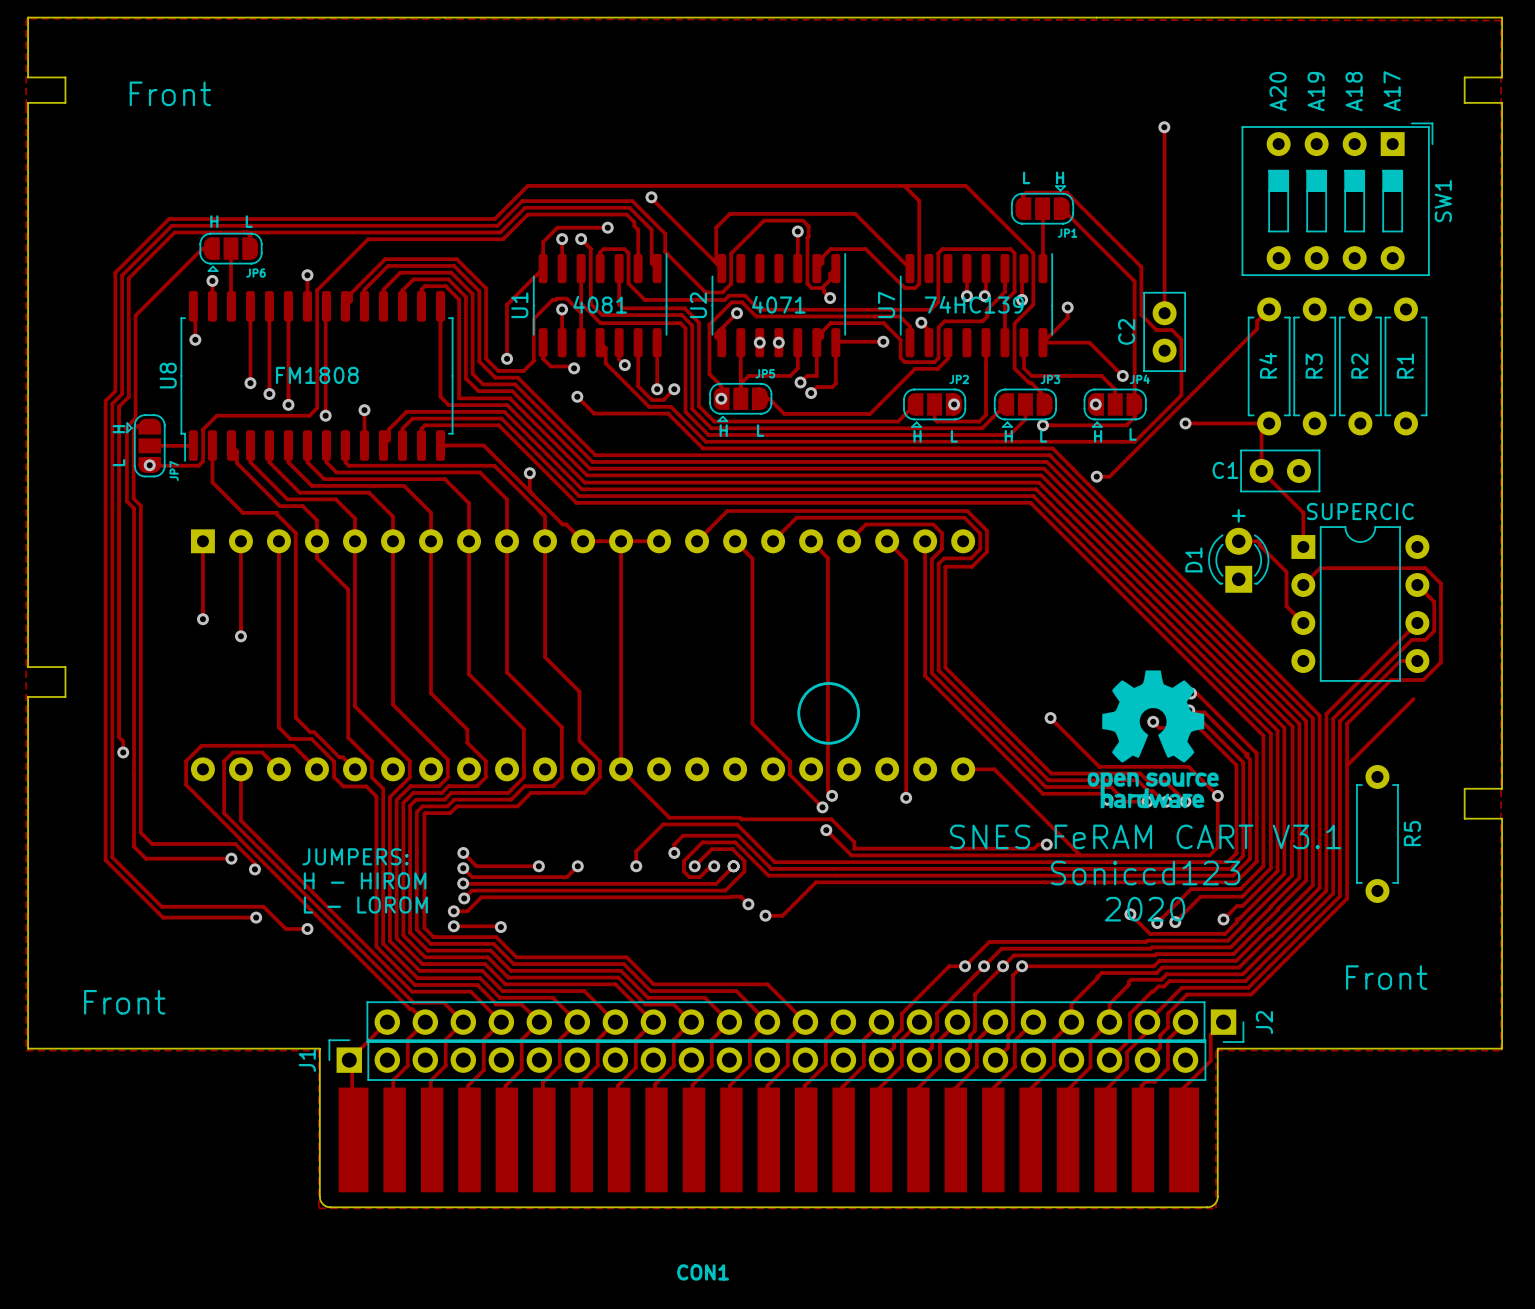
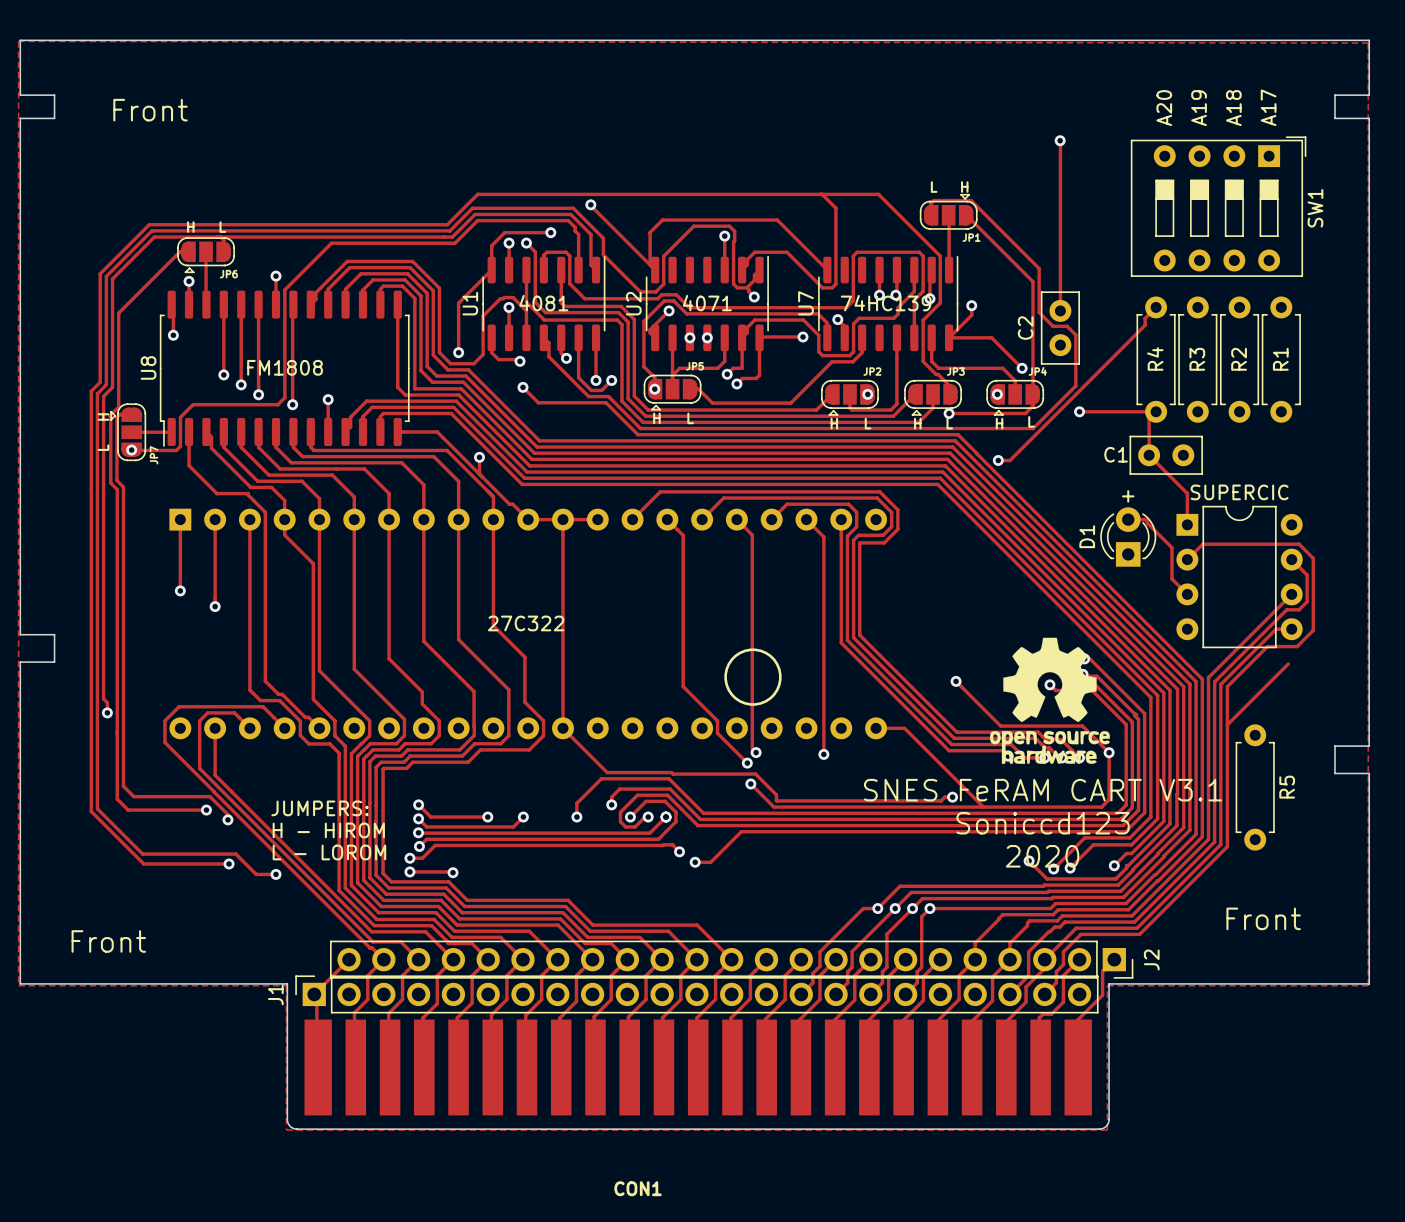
text: none -> 27C322 (526, 623)

